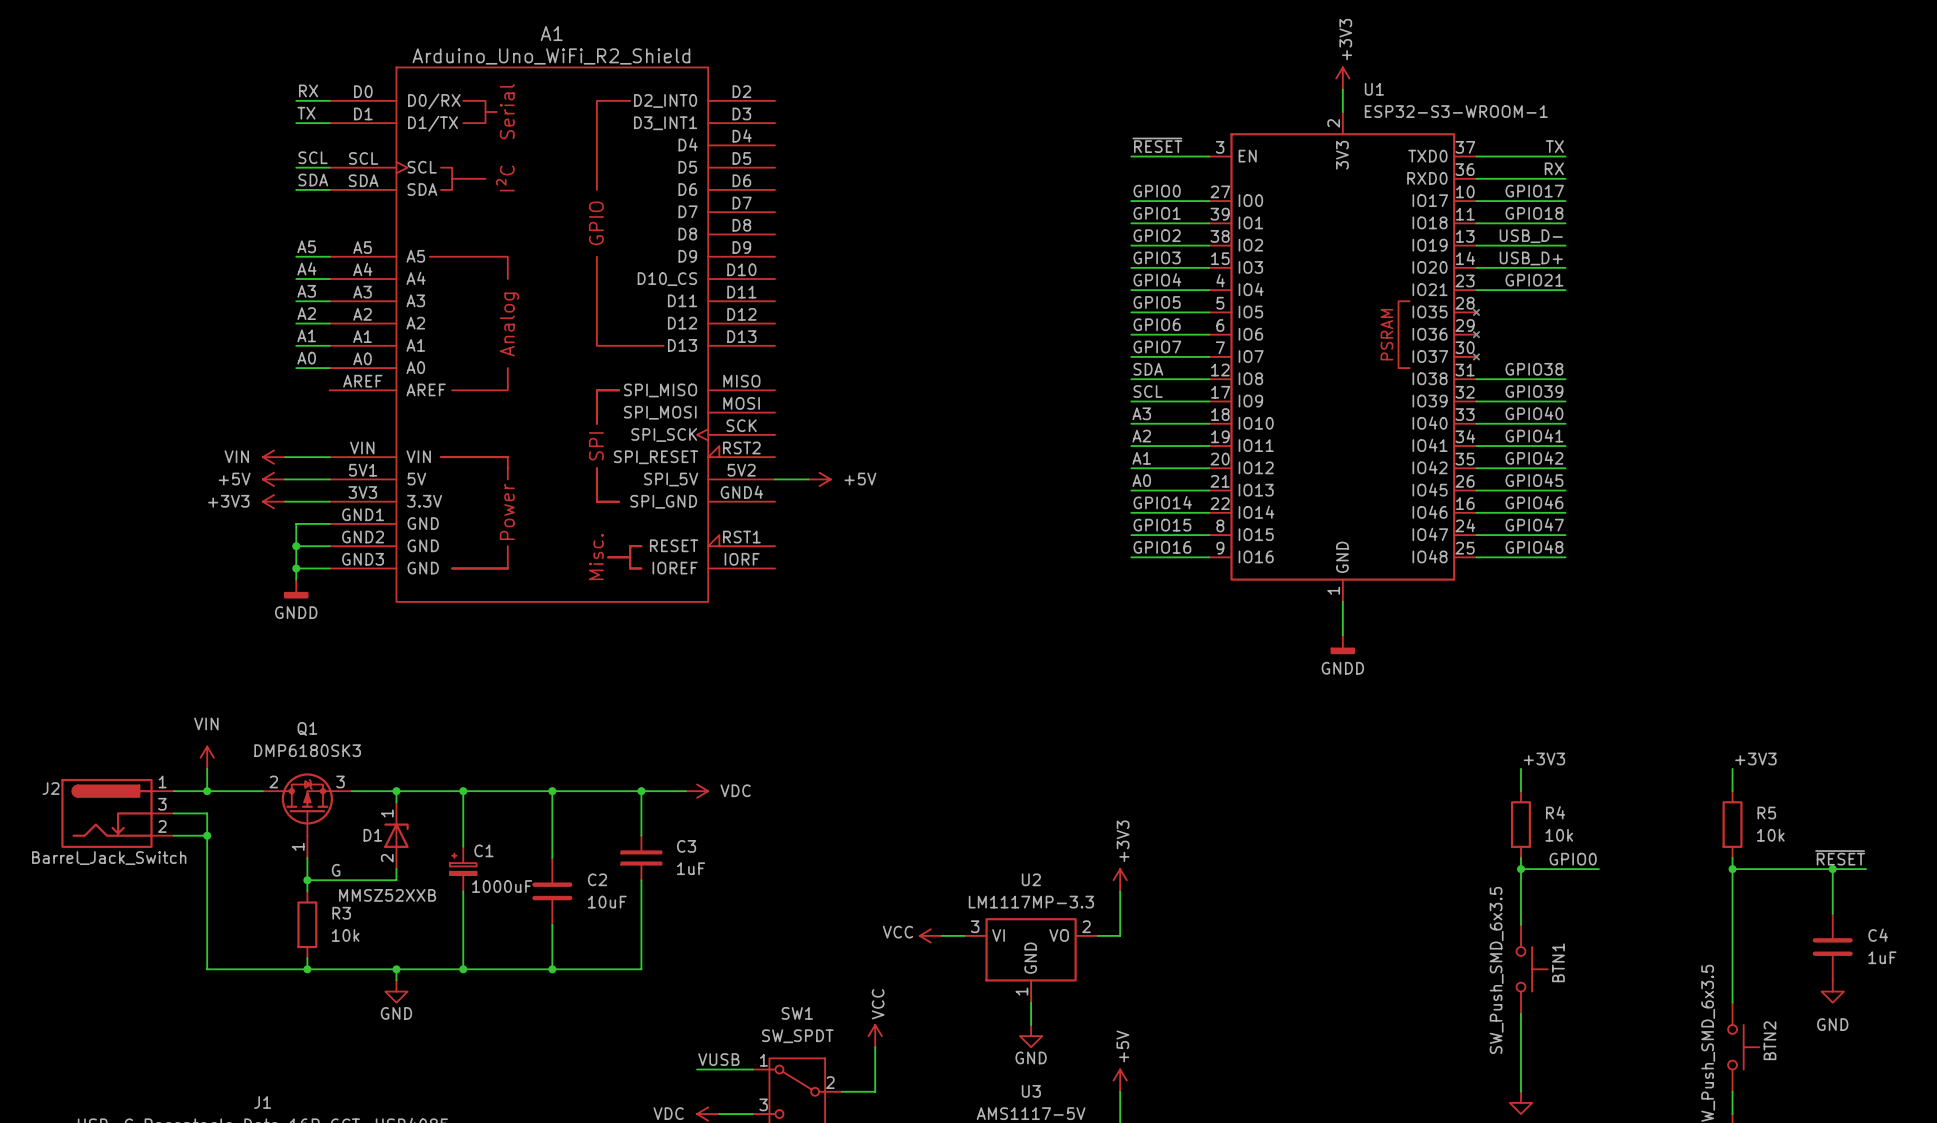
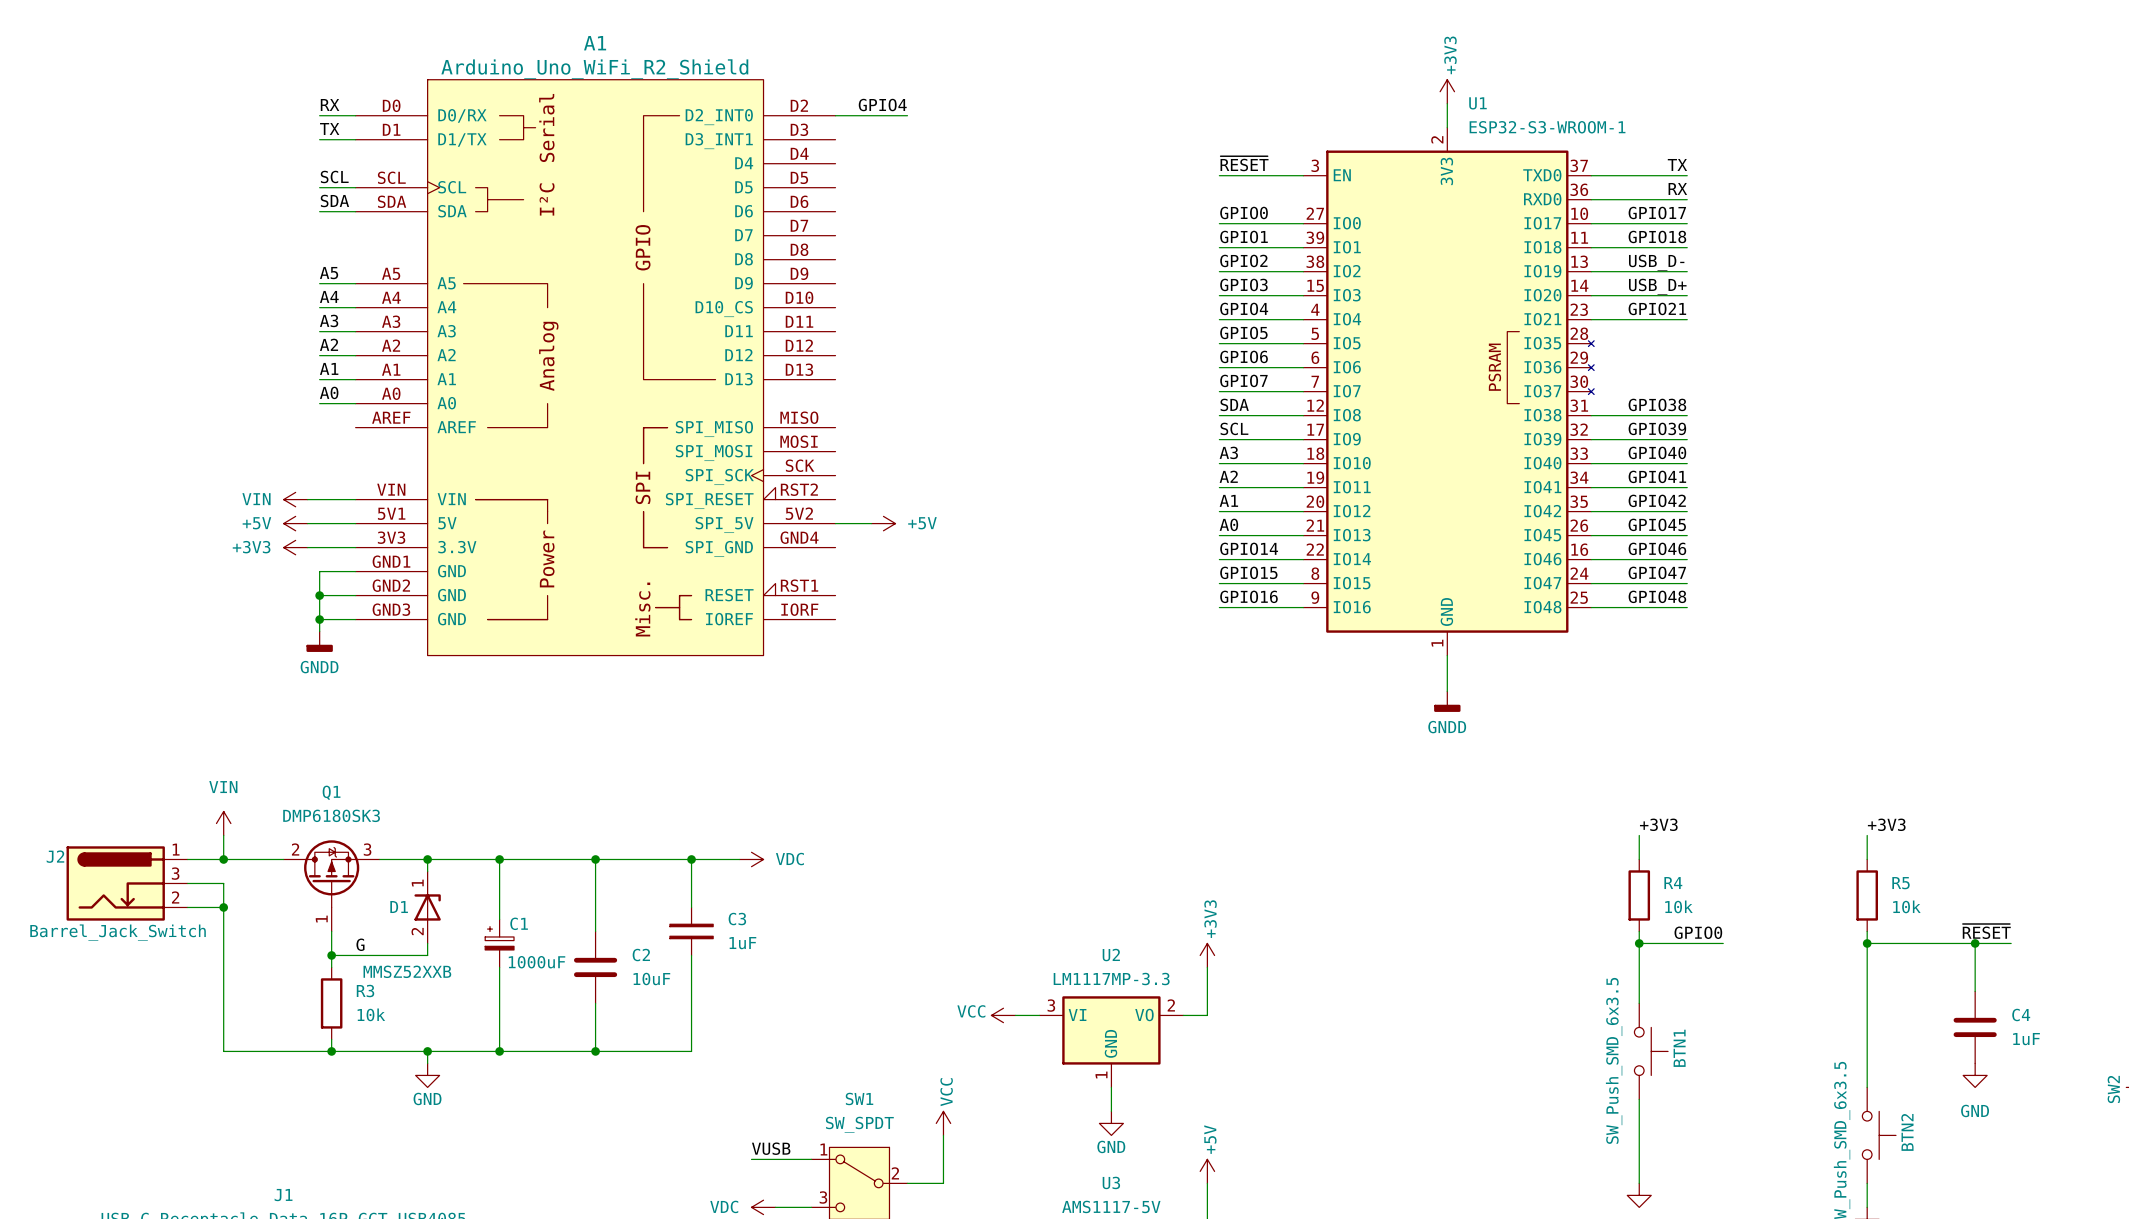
label: none -> GPIO4 (882, 105)
wire: none -> (835, 115) (907, 115)

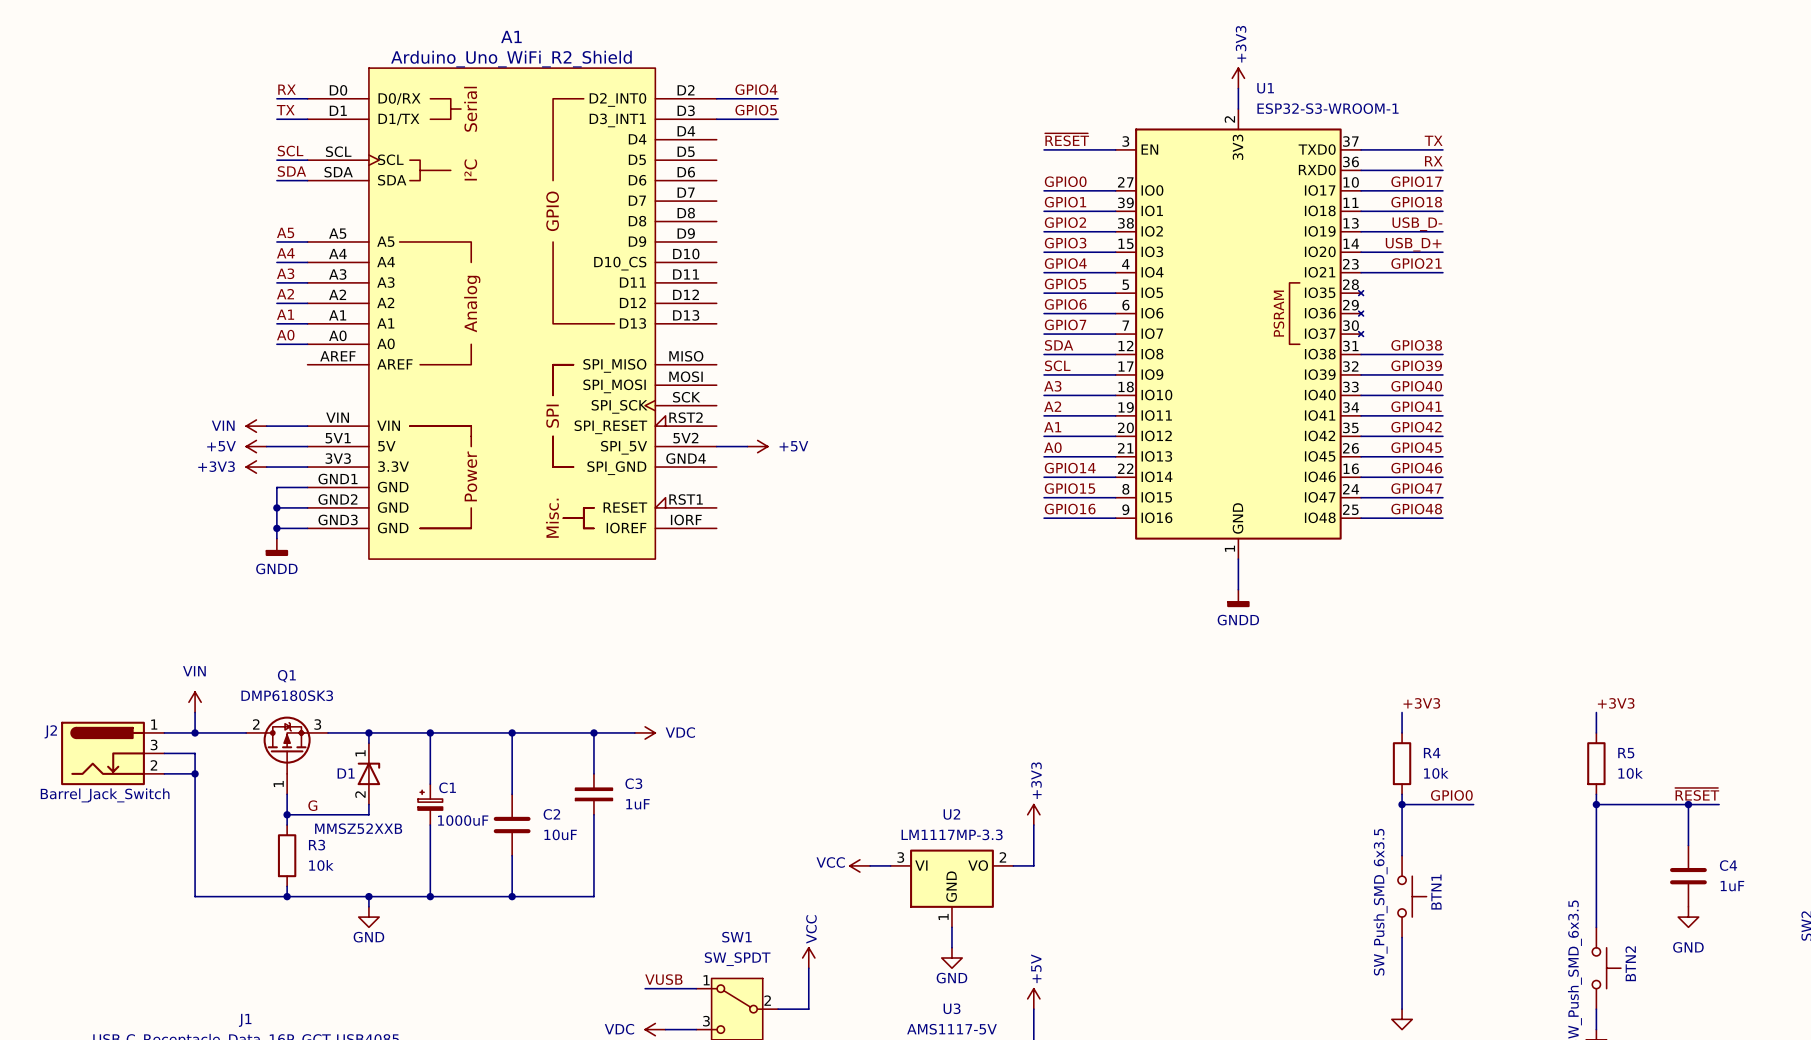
label: none -> GPIO5 (756, 110)
wire: none -> (716, 119) (778, 119)

